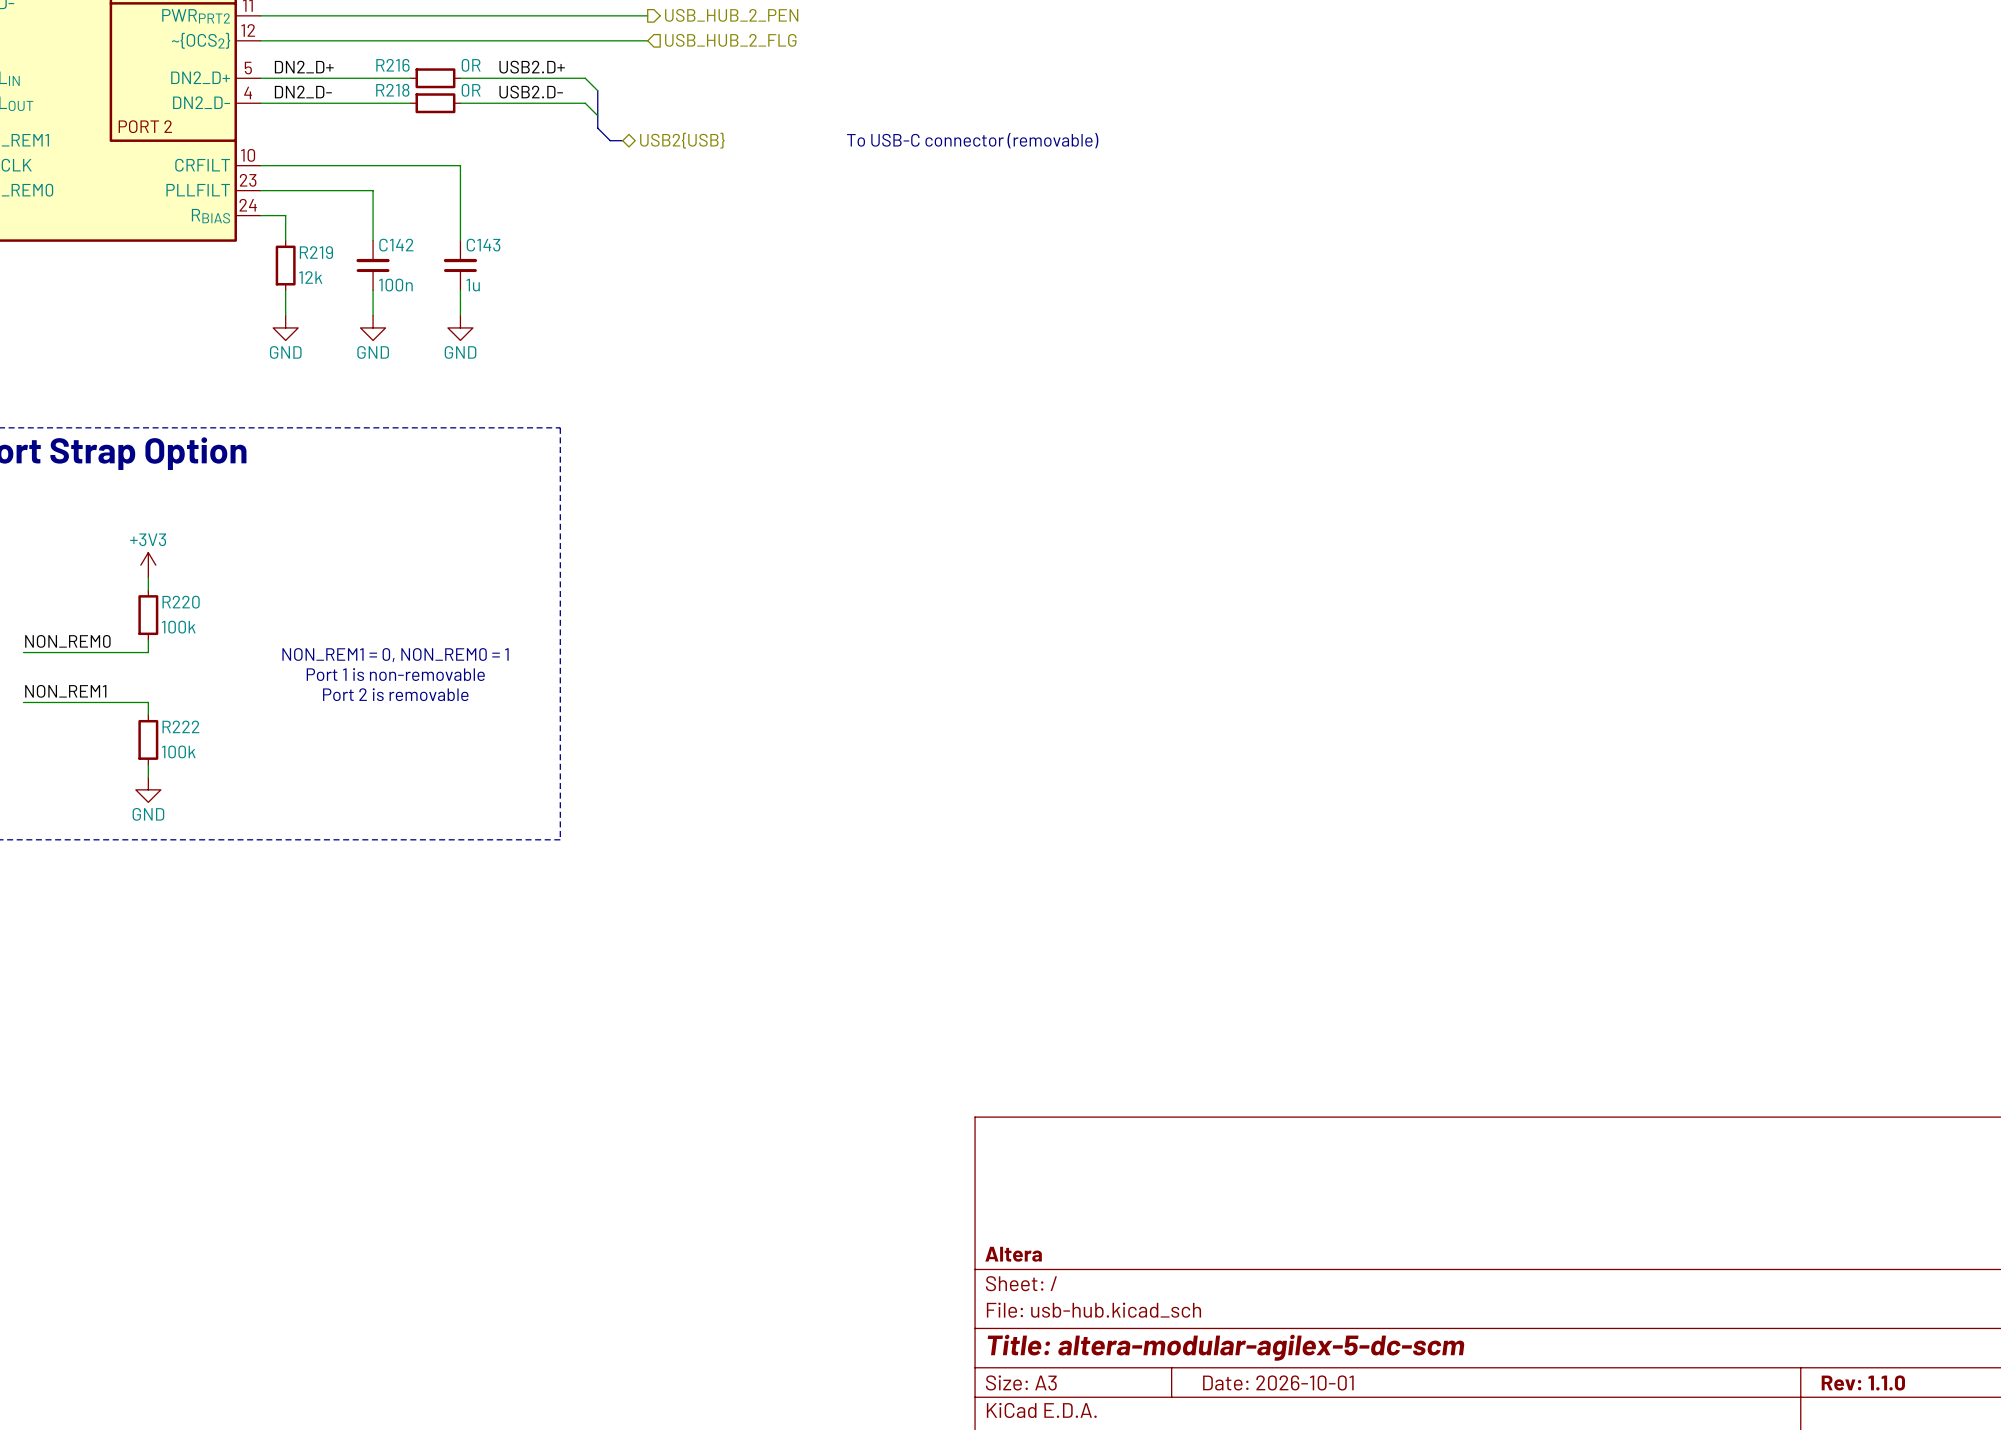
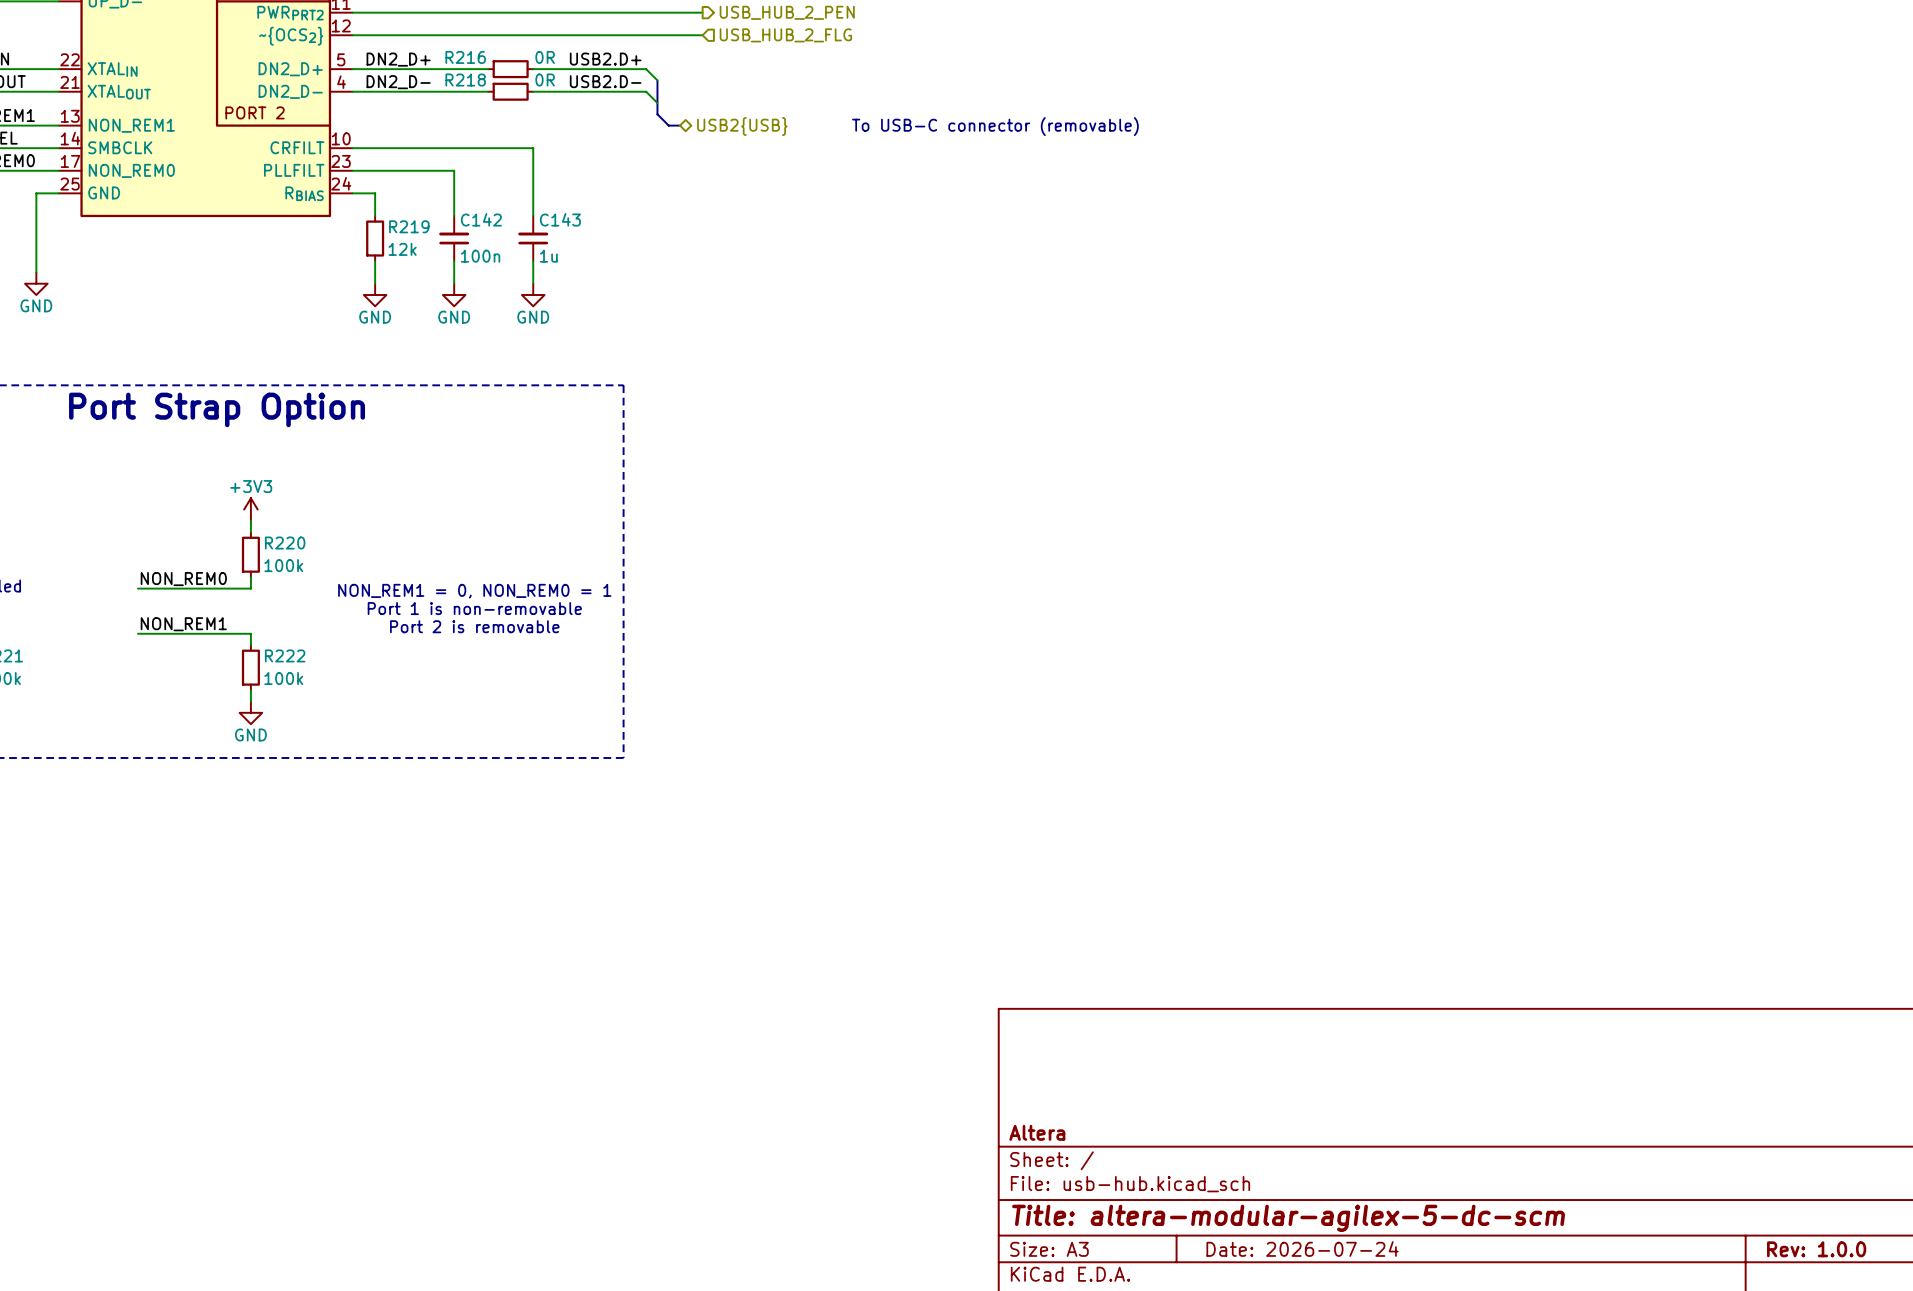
title block: Date: 2026-10-01 (1278, 1382) -> Date: 2026-07-24 (1302, 1248)
title block: Rev: 1.1.0 (1863, 1382) -> Rev: 1.0.0 (1816, 1249)

